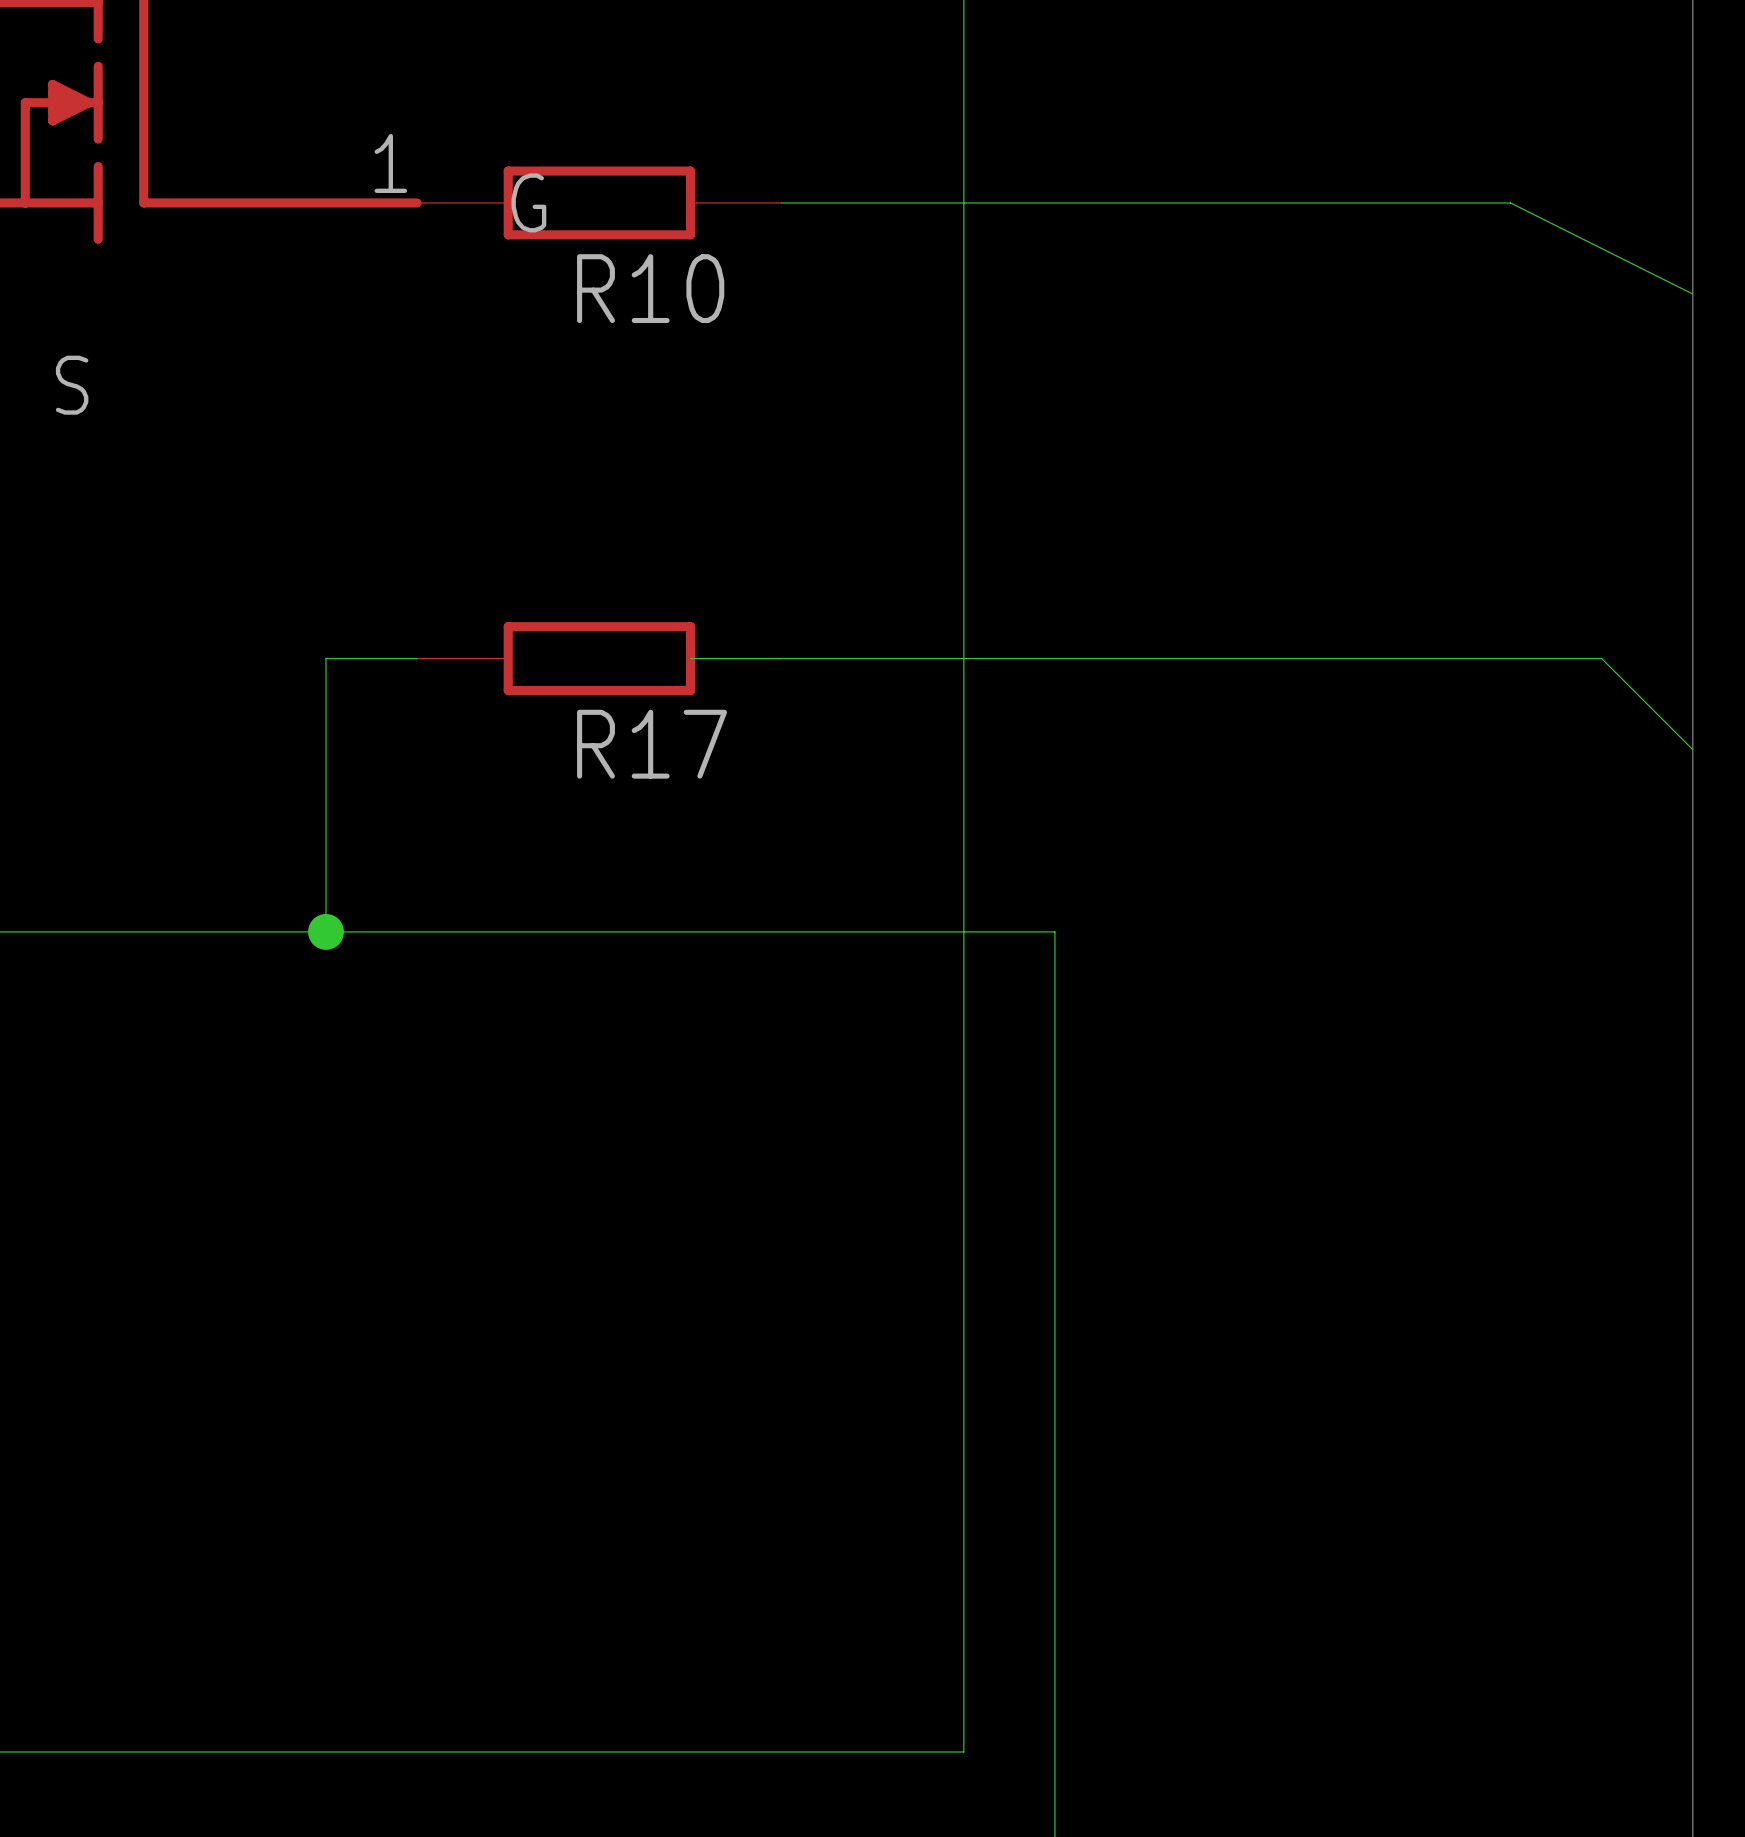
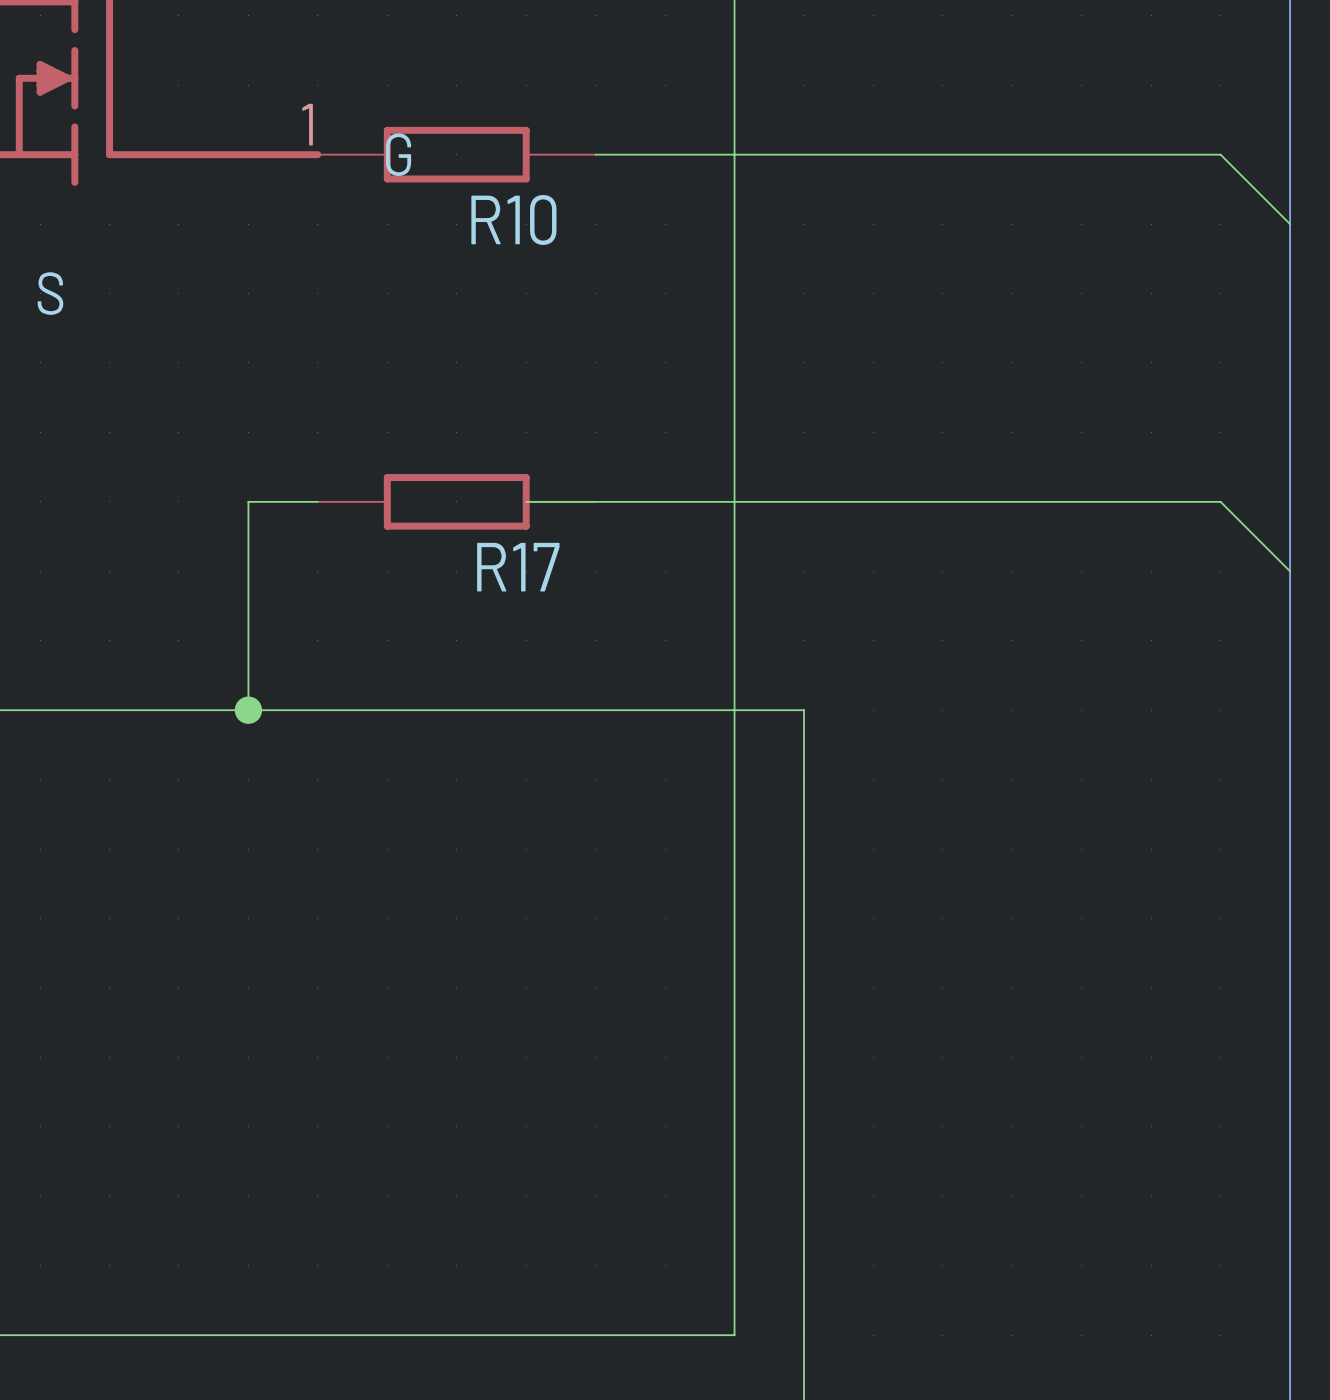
wire: (1510, 202) (1692, 294) -> (1151, 154) (1220, 154) (1290, 224)

